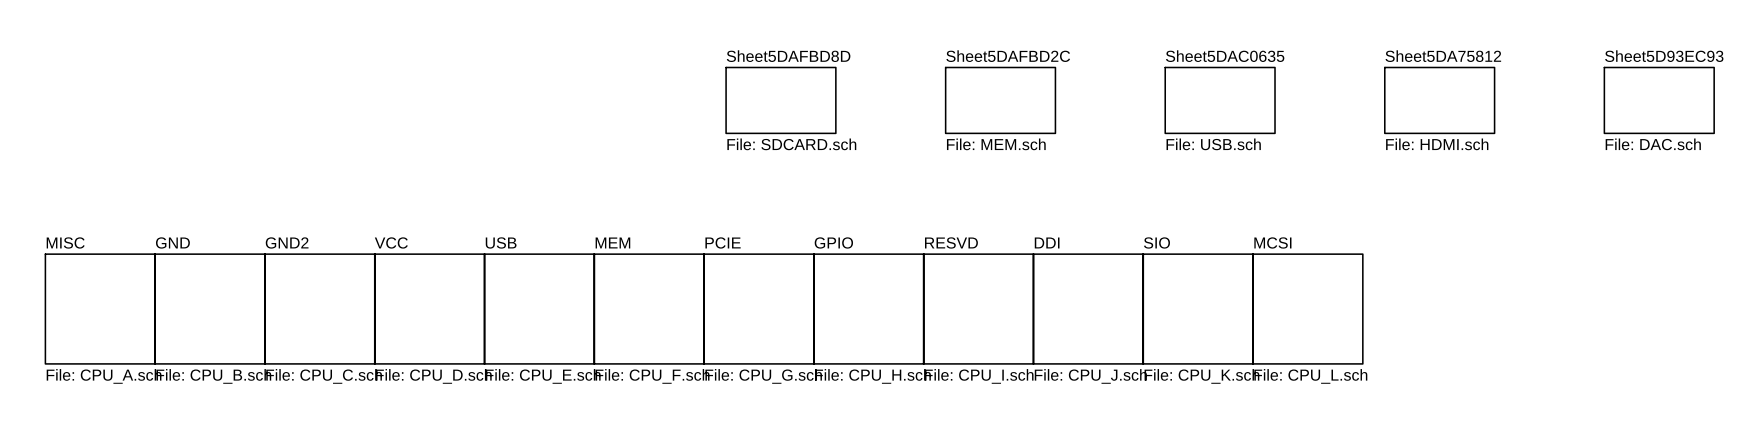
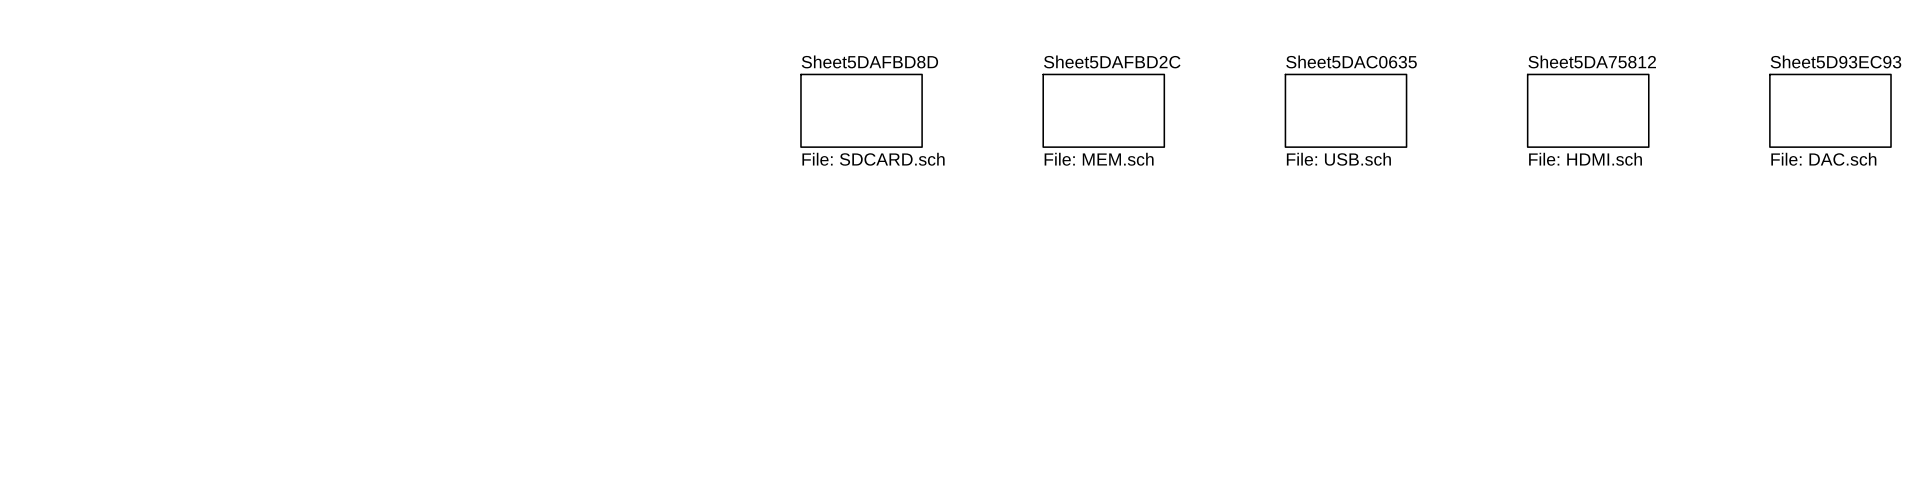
sheet MISC: File: CPU_A.sch (100, 309) -> none
sheet GND: File: CPU_B.sch (210, 309) -> none
sheet GND2: File: CPU_C.sch (319, 309) -> none
sheet VCC: File: CPU_D.sch (429, 309) -> none
sheet USB: File: CPU_E.sch (539, 309) -> none
sheet MEM: File: CPU_F.sch (649, 309) -> none
sheet PCIE: File: CPU_G.sch (759, 309) -> none
sheet GPIO: File: CPU_H.sch (868, 309) -> none
sheet RESVD: File: CPU_I.sch (978, 309) -> none
sheet DDI: File: CPU_J.sch (1088, 309) -> none
sheet SIO: File: CPU_K.sch (1198, 309) -> none
sheet MCSI: File: CPU_L.sch (1307, 309) -> none

